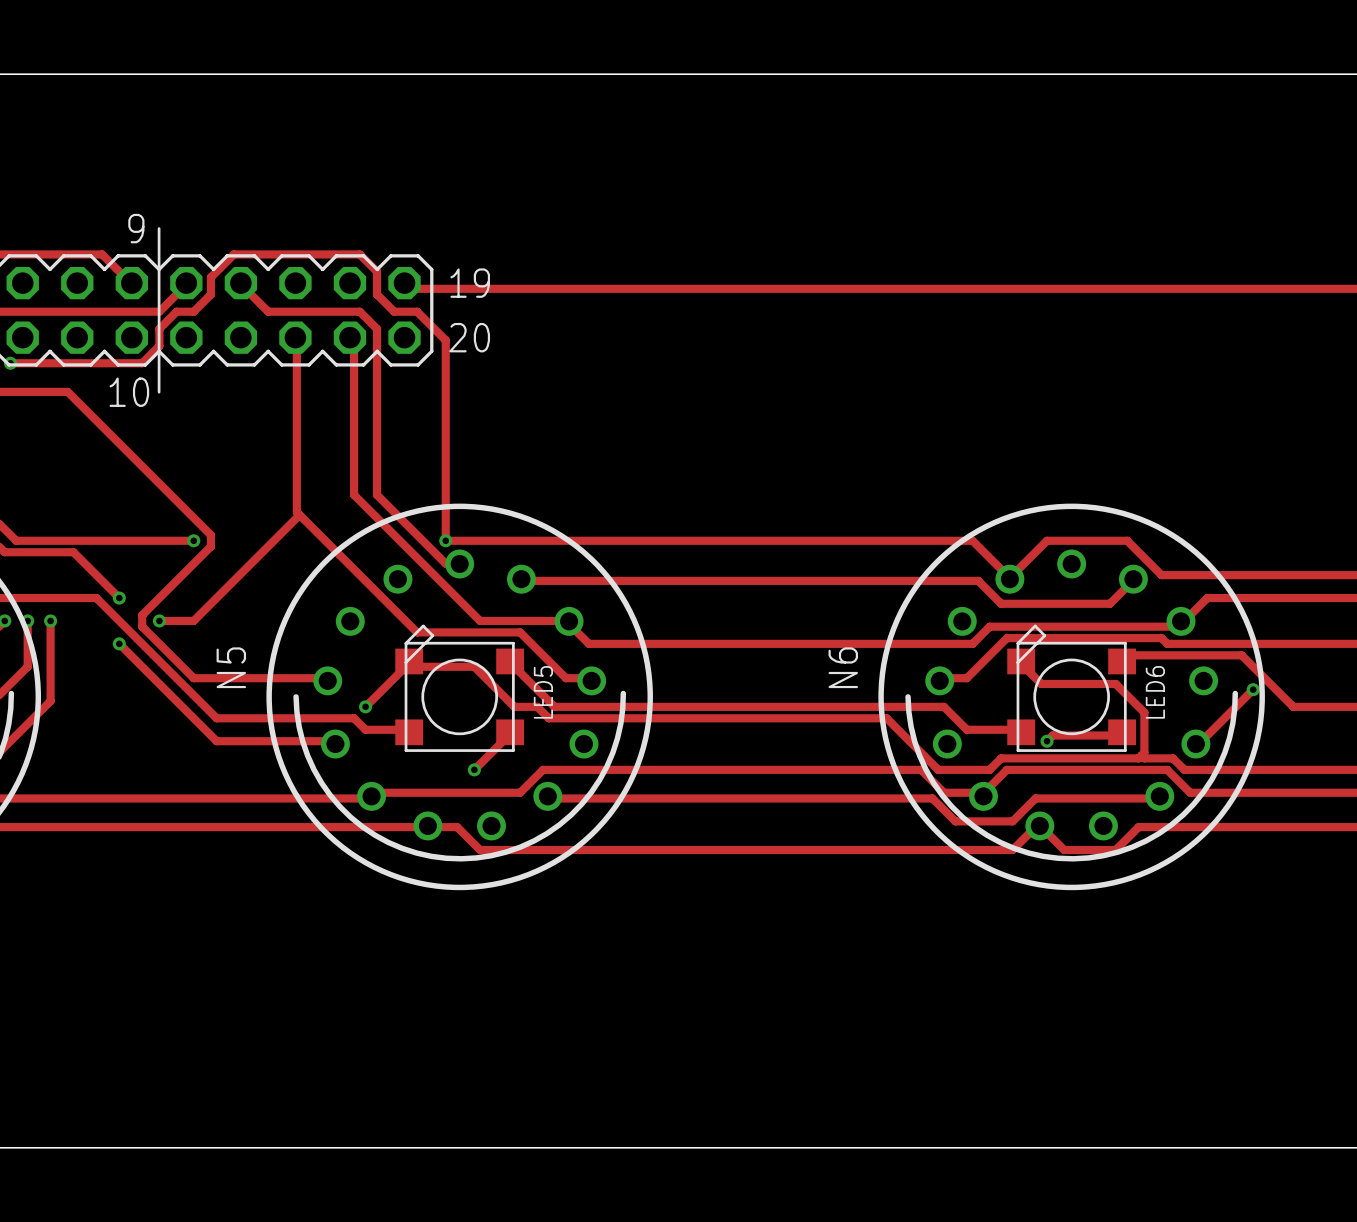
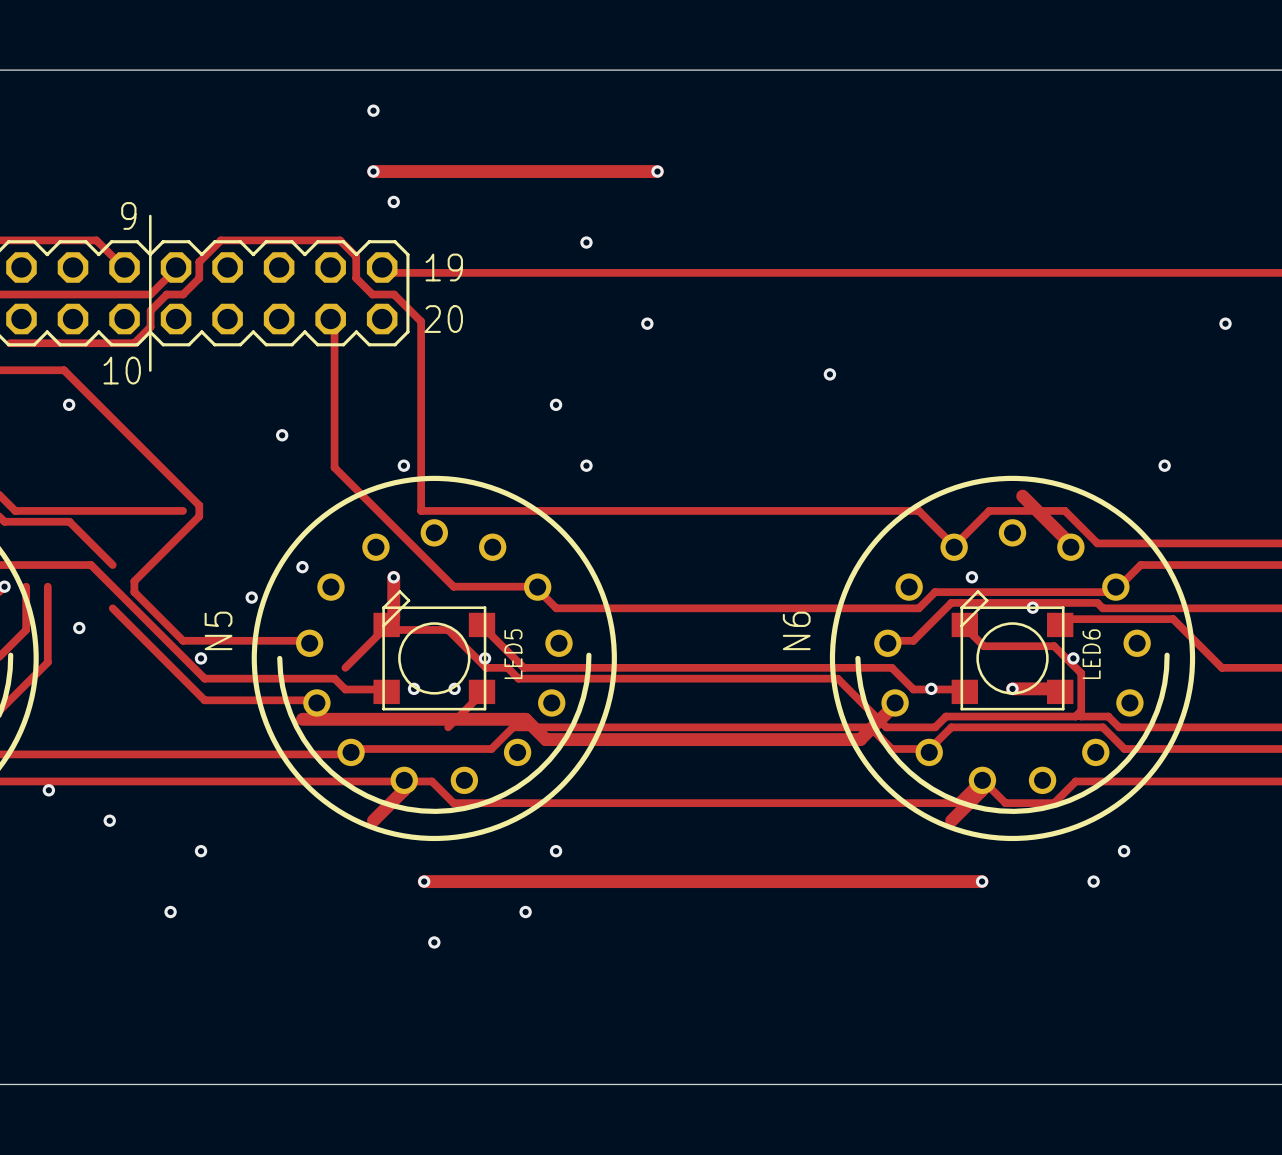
via: none -> (373, 110)
track: none -> (373, 171) (657, 171)
via: none -> (373, 171)
via: none -> (657, 171)
via: none -> (393, 201)
via: none -> (586, 242)
track: (240, 283) (268, 311) (359, 311) (377, 328) (377, 494) (445, 563) (459, 563) -> none
track: (295, 337) (296, 512) (299, 515) -> none
via: none -> (647, 323)
via: none -> (1225, 323)
via: (10, 363) -> none
via: none -> (829, 374)
via: none -> (69, 404)
via: none -> (556, 404)
via: none -> (282, 435)
via: none -> (403, 465)
via: none -> (586, 465)
via: none -> (1164, 465)
track: (299, 515) (417, 632) (520, 632) (565, 678) (588, 678) (591, 680) -> none
track: (299, 515) (193, 620) (159, 620) -> none
via: (193, 540) -> none
via: (445, 540) -> none
track: (521, 579) (525, 580) (978, 580) (1001, 603) (1110, 603) (1133, 579) -> (1022, 496) (1073, 546) (1070, 547)
via: (119, 598) -> none
via: none -> (302, 567)
track: none -> (393, 577) (393, 617) (386, 624)
via: none -> (393, 577)
via: none -> (971, 577)
via: (27, 620) -> none
via: (50, 620) -> none
via: (159, 620) -> none
via: none -> (251, 597)
via: (119, 643) -> none
via: none -> (1032, 607)
via: none -> (79, 628)
track: (1253, 689) (1195, 746) (1195, 744) -> none
via: (1253, 689) -> none
via: none -> (201, 658)
via: none -> (485, 658)
via: none -> (1073, 658)
via: (365, 706) -> none
via: none -> (414, 688)
via: none -> (454, 688)
via: none -> (931, 688)
track: (1122, 732) (1121, 735) (1052, 735) (1047, 741) -> (1060, 691) (1053, 688) (1012, 688)
via position: (1047, 741) -> (1012, 688)
track: none -> (895, 702) (860, 739) (545, 739) (525, 719) (302, 719)
via: (474, 769) -> none
track: (547, 796) (548, 798) (932, 798) (955, 821) (1012, 821) (1035, 798) (1155, 798) (1159, 796) -> none
track: none -> (404, 780) (403, 790) (373, 820)
track: none -> (982, 780) (982, 790) (951, 820)
via: none -> (48, 790)
via: none -> (109, 820)
via: none -> (201, 851)
via: none -> (556, 851)
via: none -> (1124, 851)
track: none -> (424, 881) (982, 881)
via: none -> (424, 881)
via: none -> (982, 881)
via: none -> (1093, 881)
via: none -> (170, 912)
via: none -> (525, 912)
via: none -> (434, 942)

